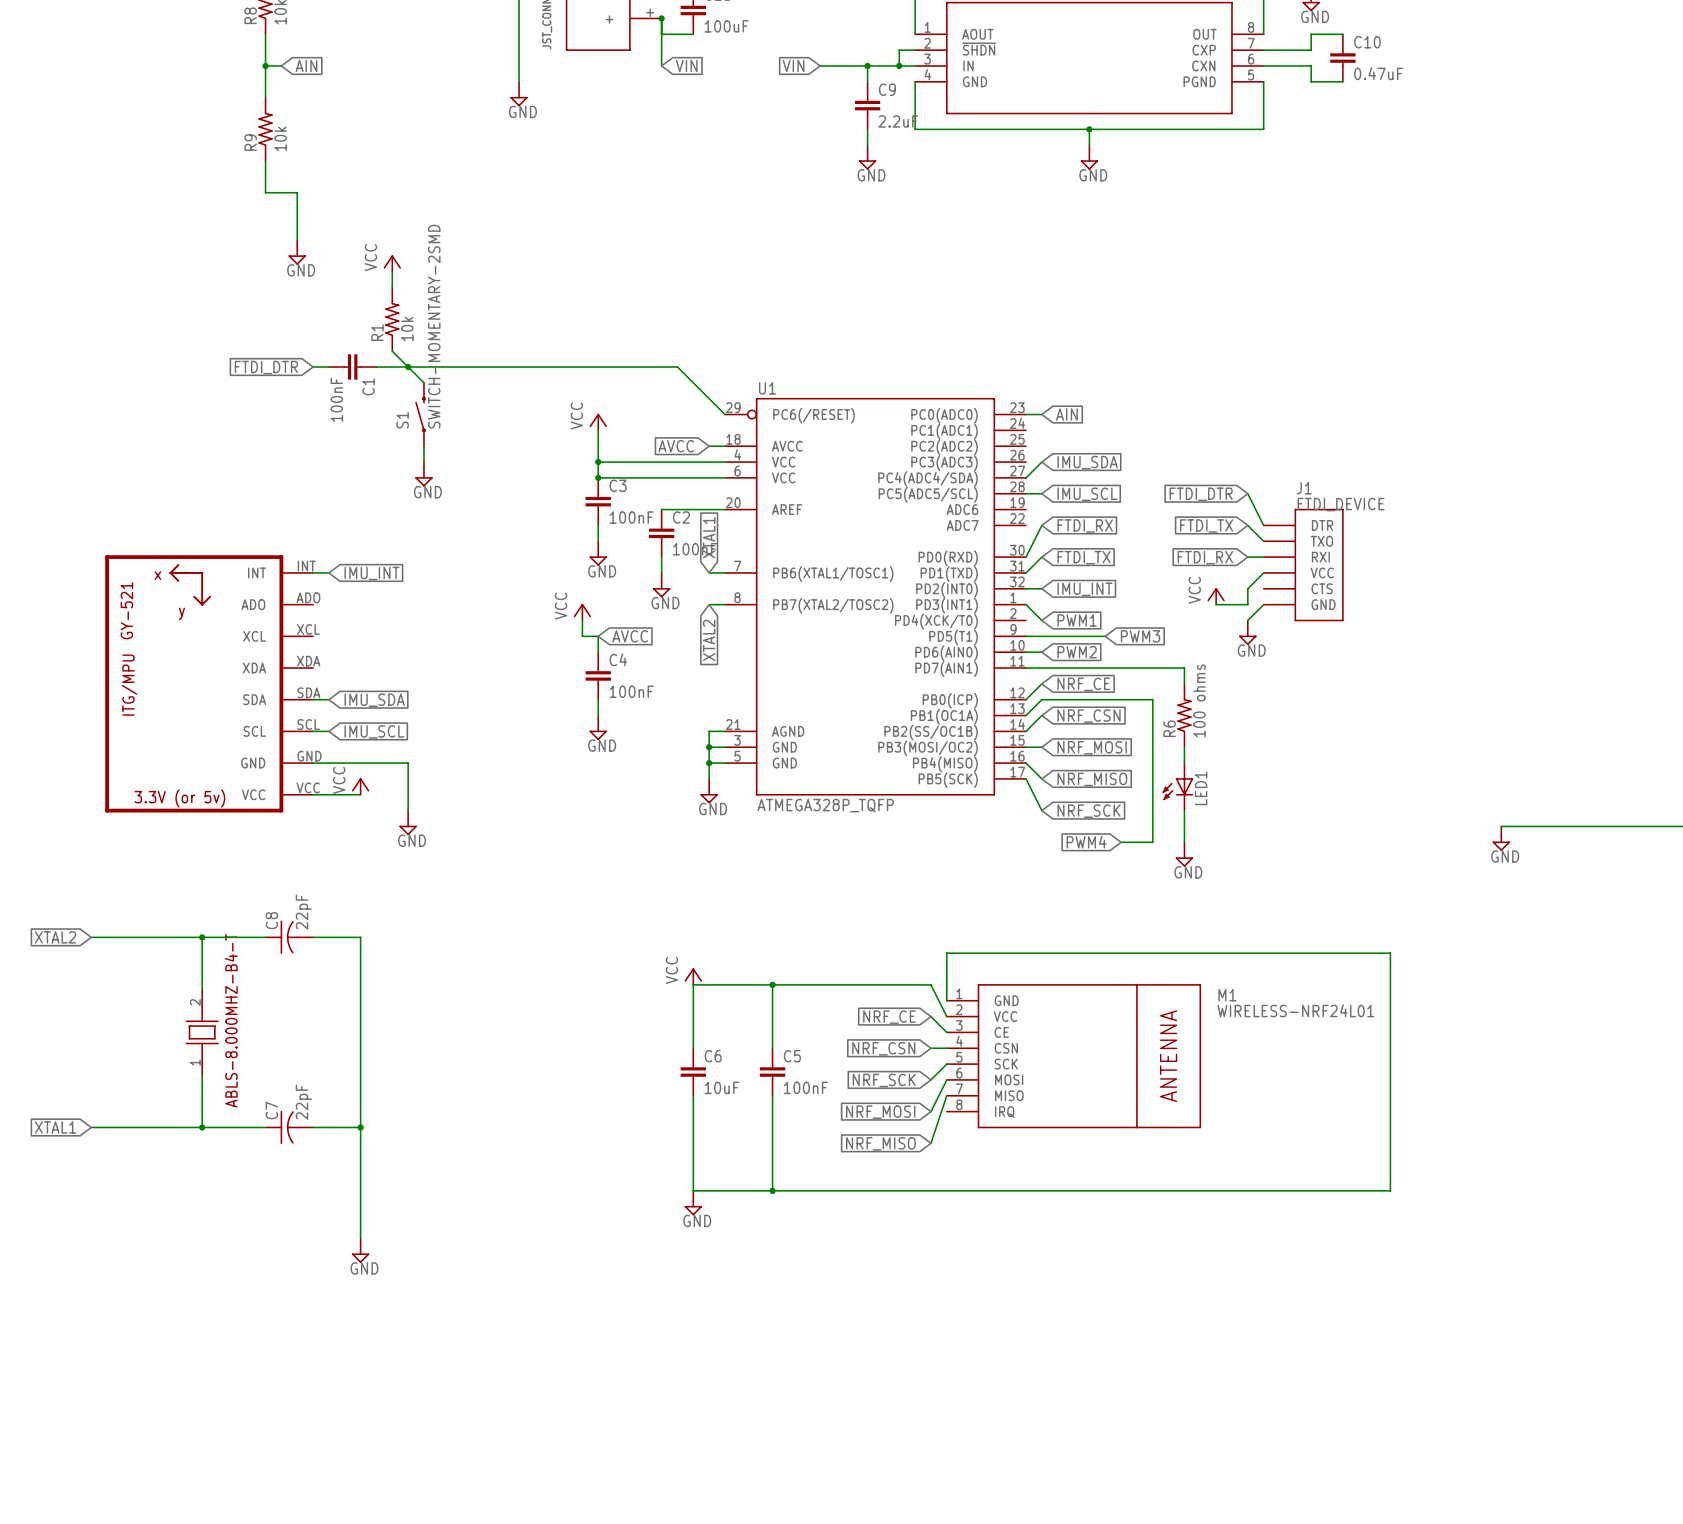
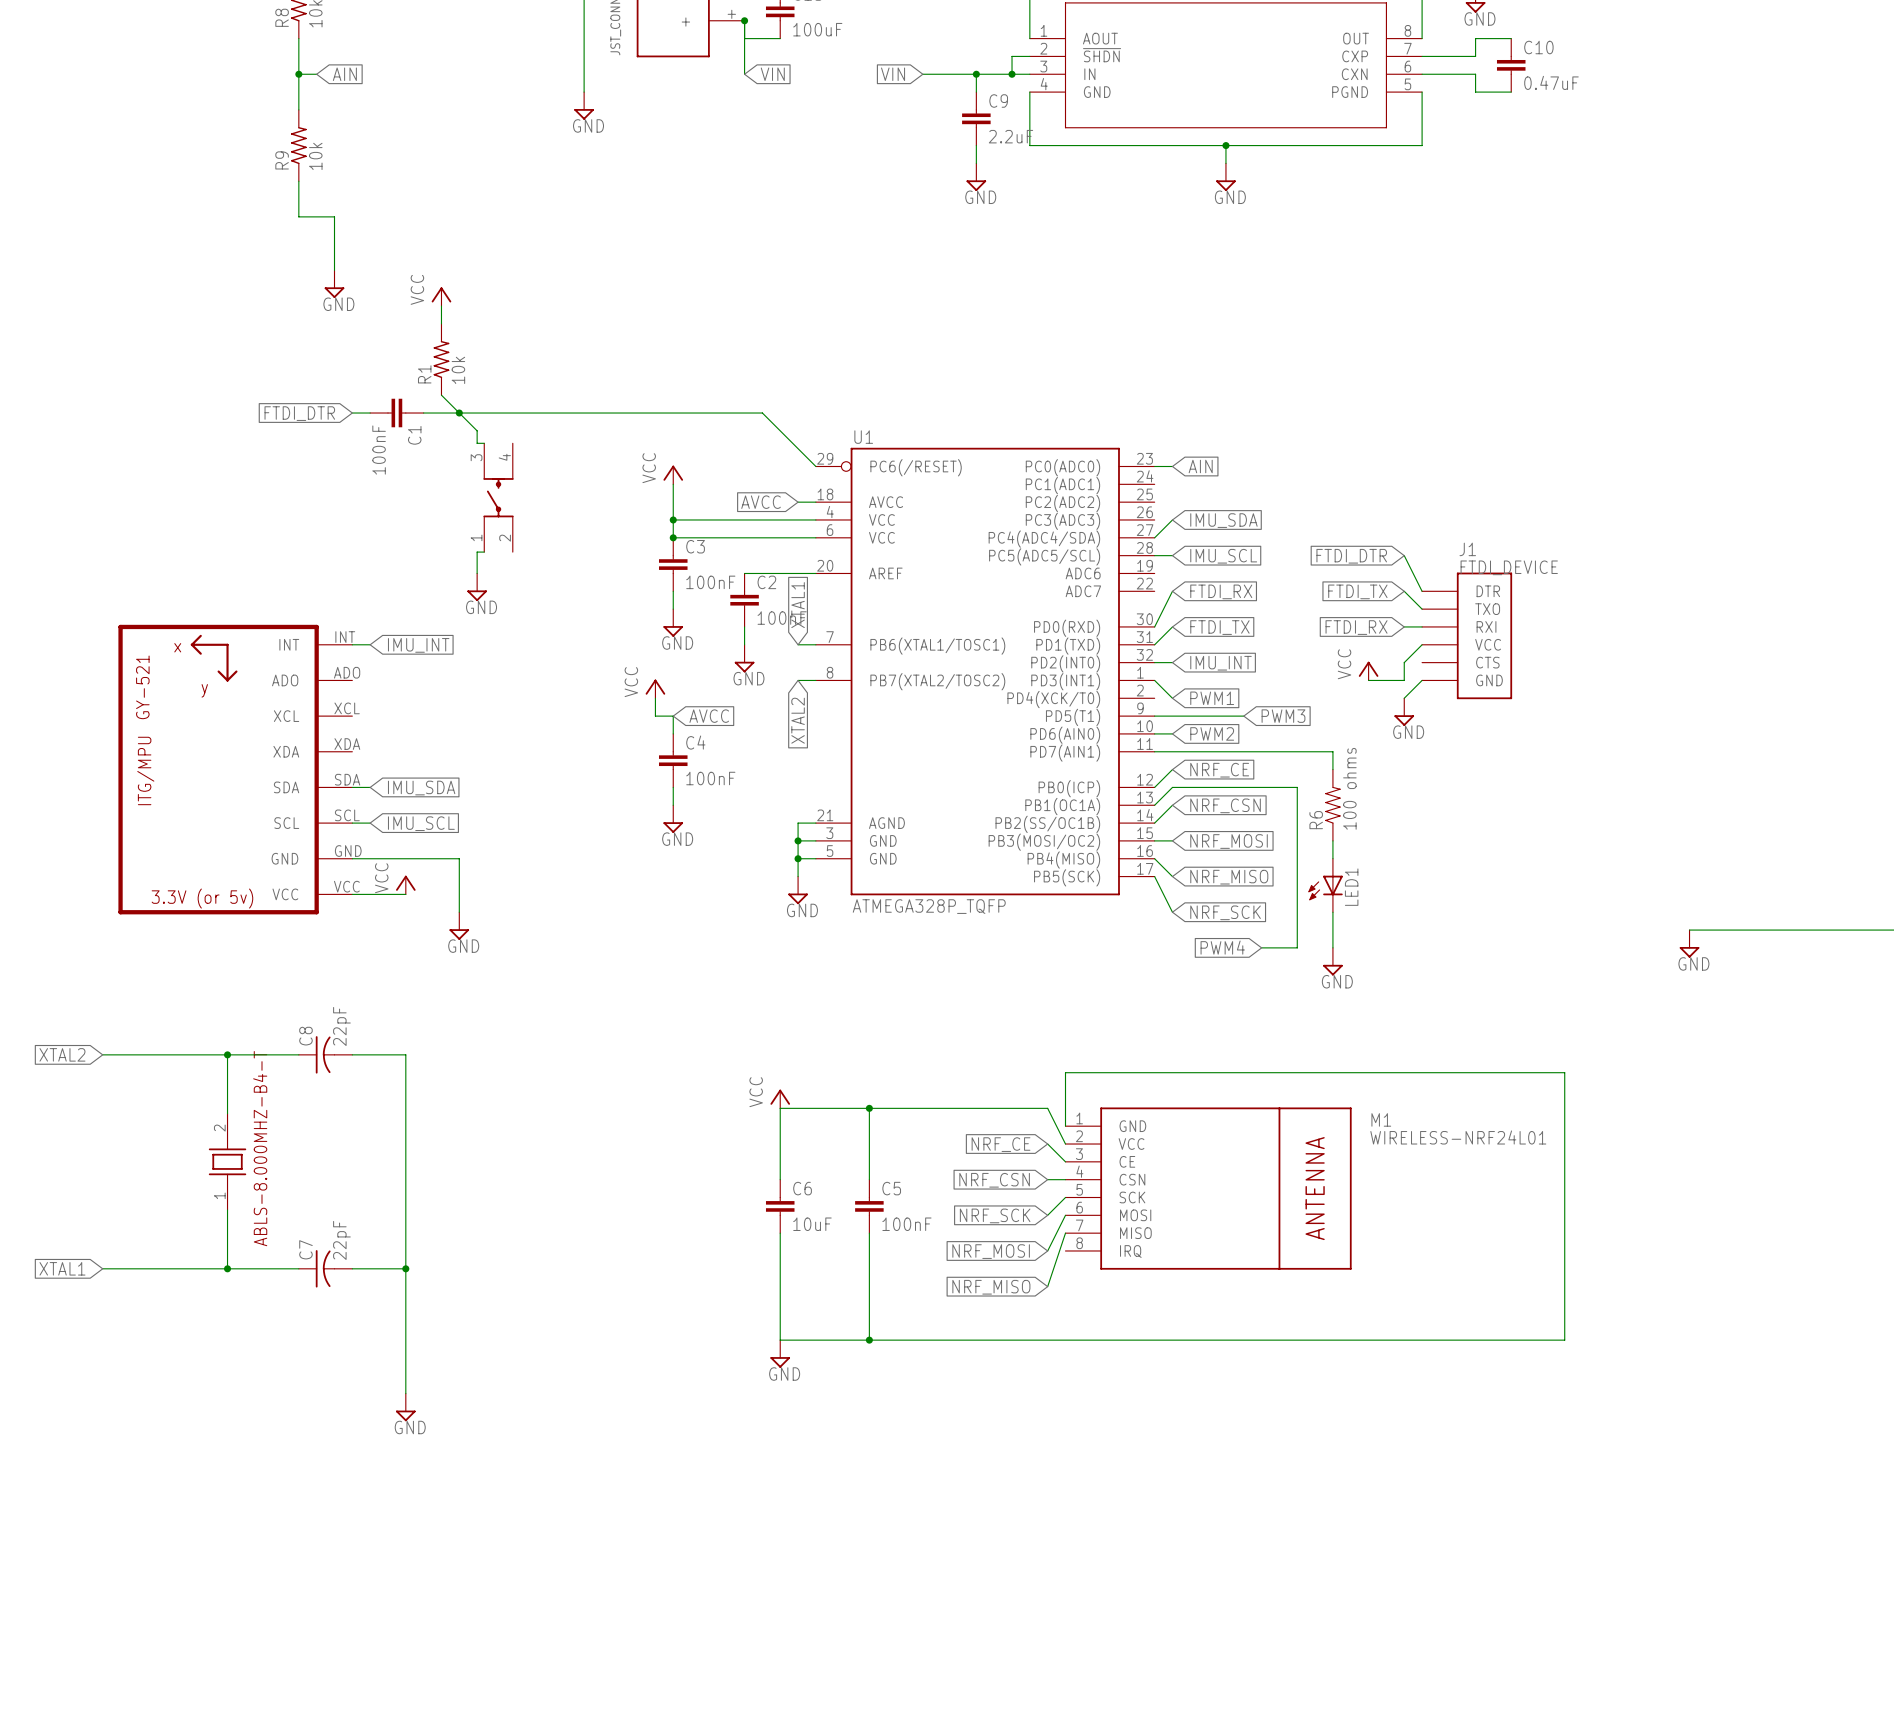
S1: SWITCH-MOMENTARY-2SMD (420, 414) -> none
part: none -> (498, 497)
wire: (423, 446) (423, 462) -> none
power symbol position: GND (423, 474) -> GND (477, 587)
wire: none -> (484, 552) (477, 552) (477, 573)

